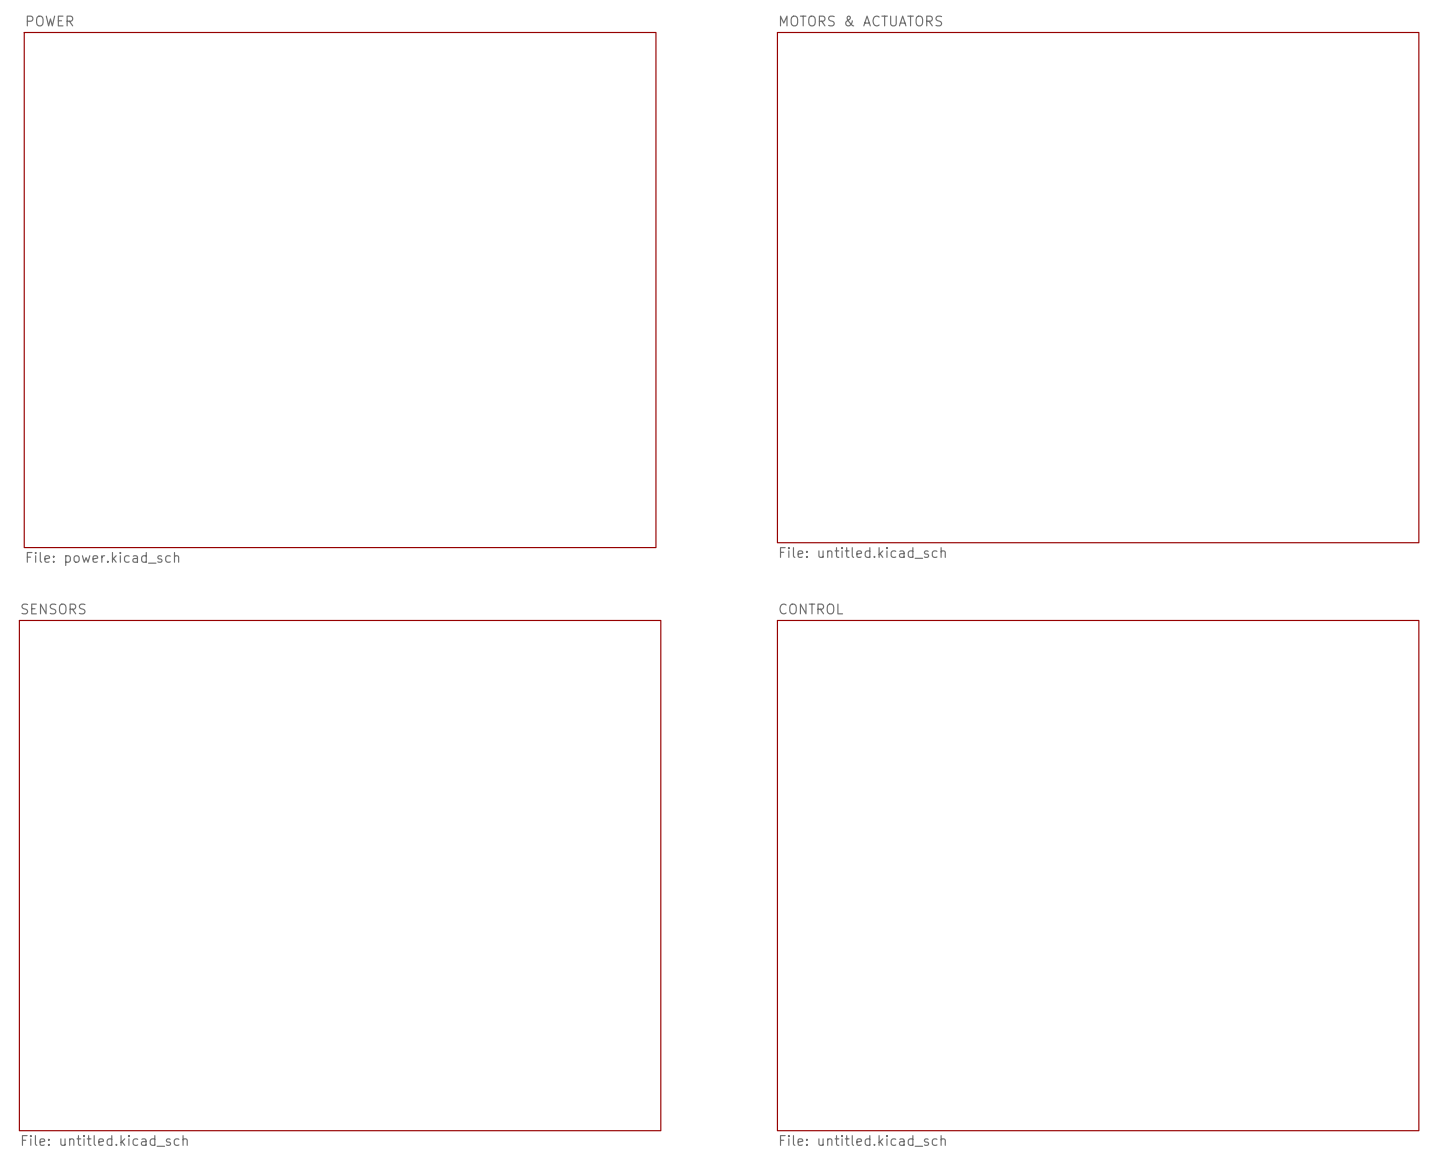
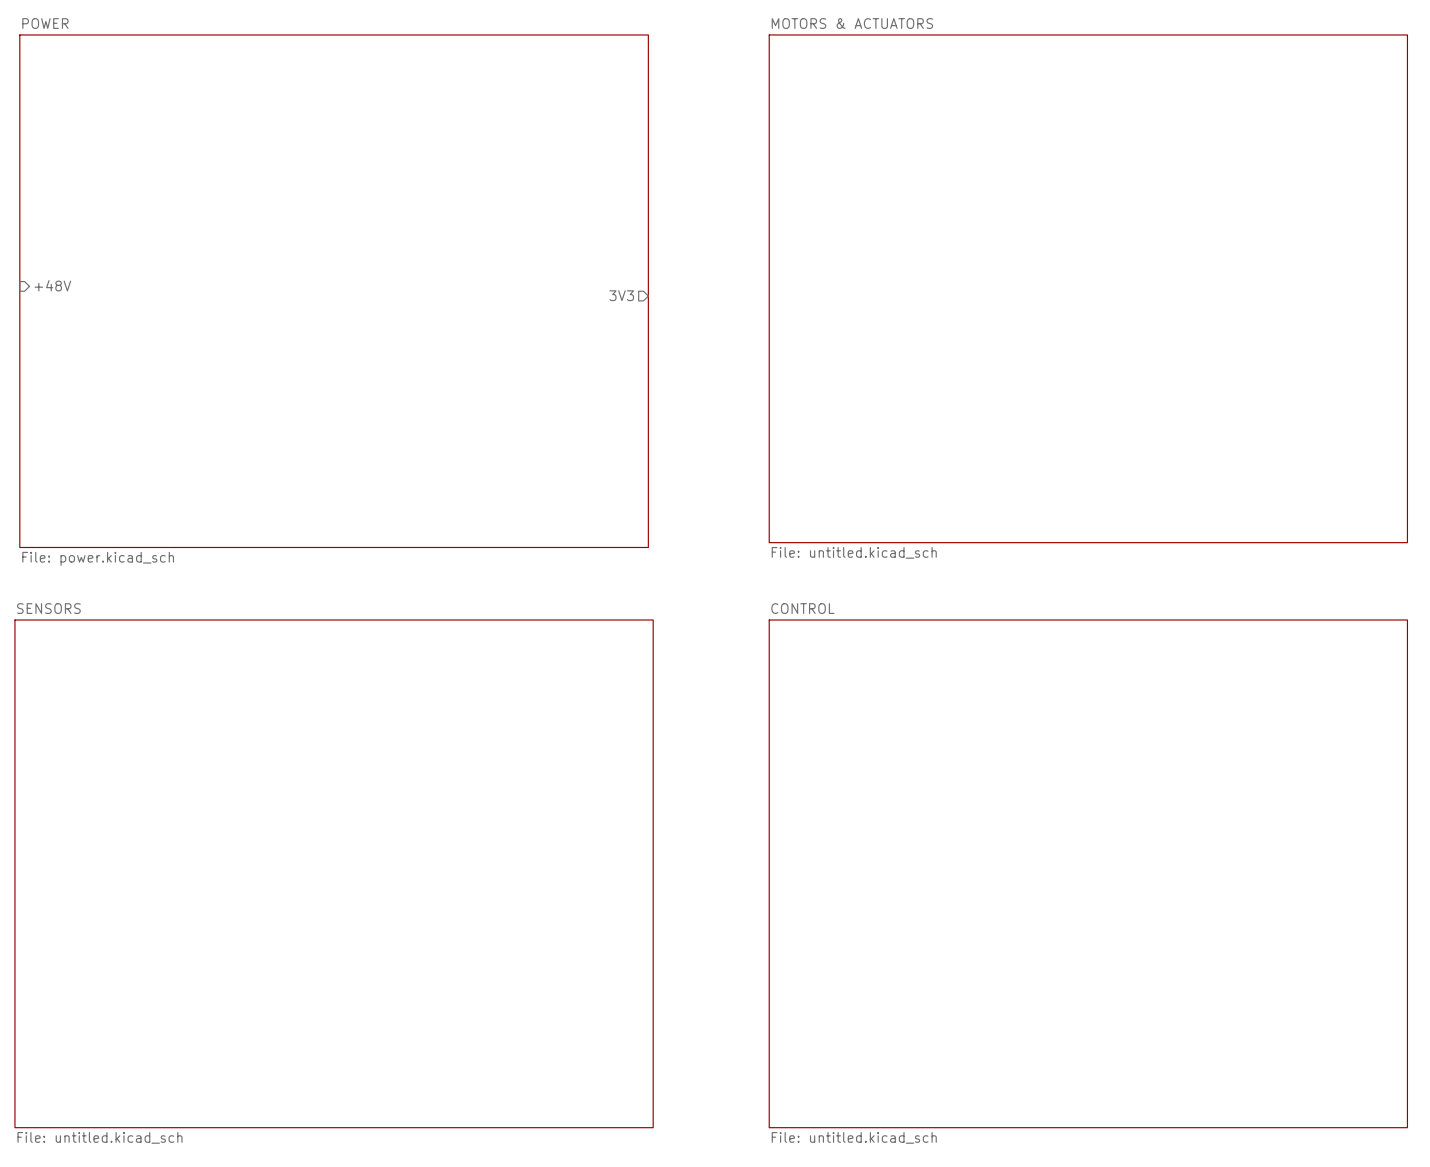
sheet pin: none -> +48V (52, 285)
sheet pin: none -> 3V3 (621, 295)

